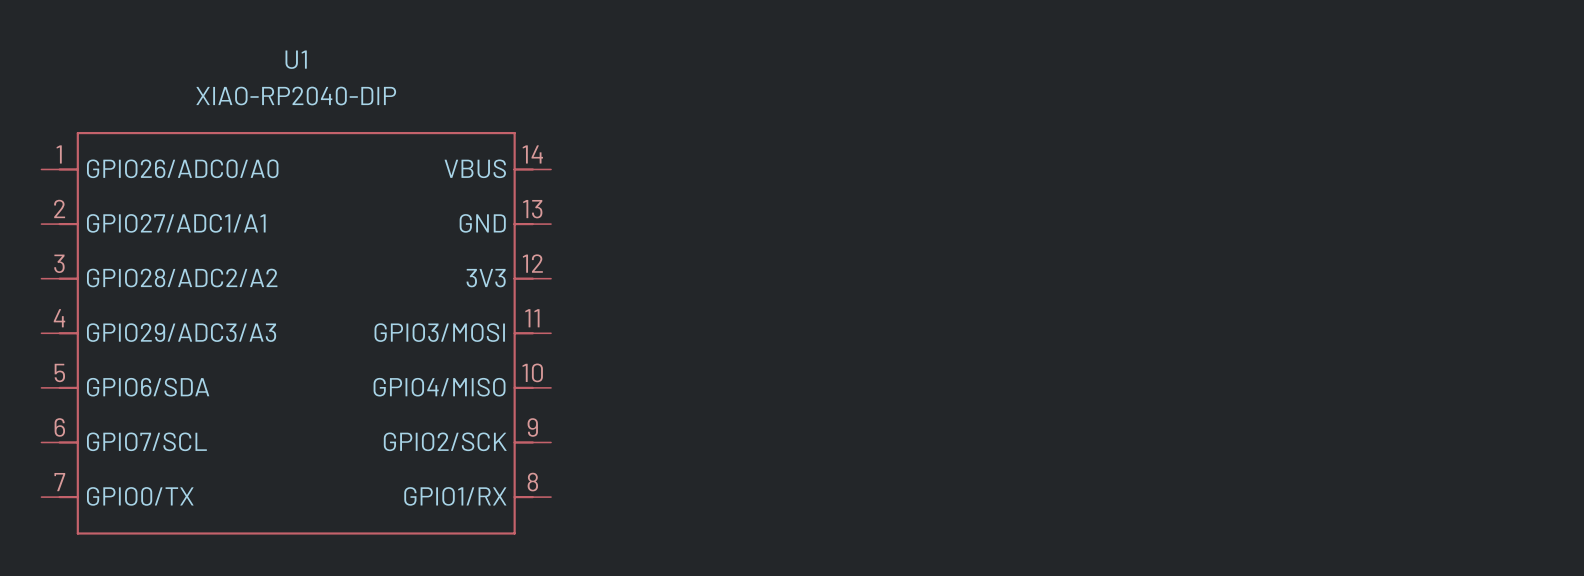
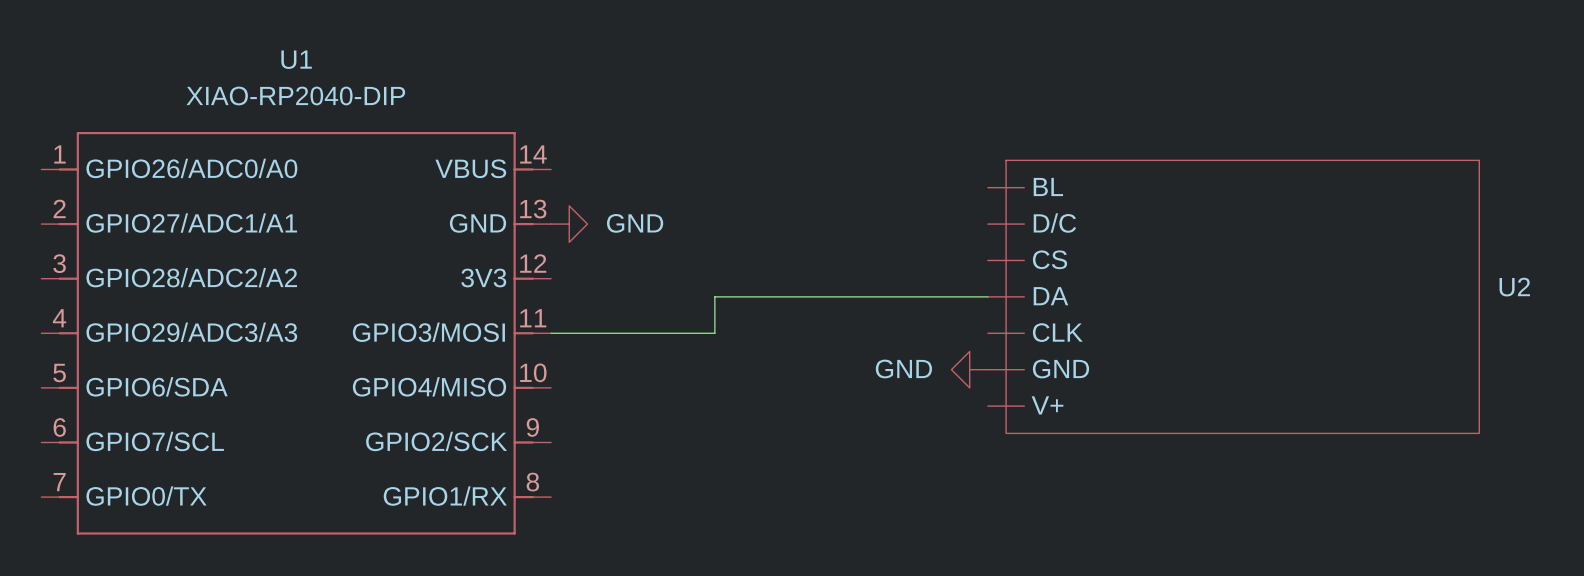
power symbol: none -> GND (569, 224)
wire: none -> (987, 296) (714, 296) (714, 333) (551, 333)
U2: none -> (1233, 296)
power symbol: none -> GND (969, 369)

